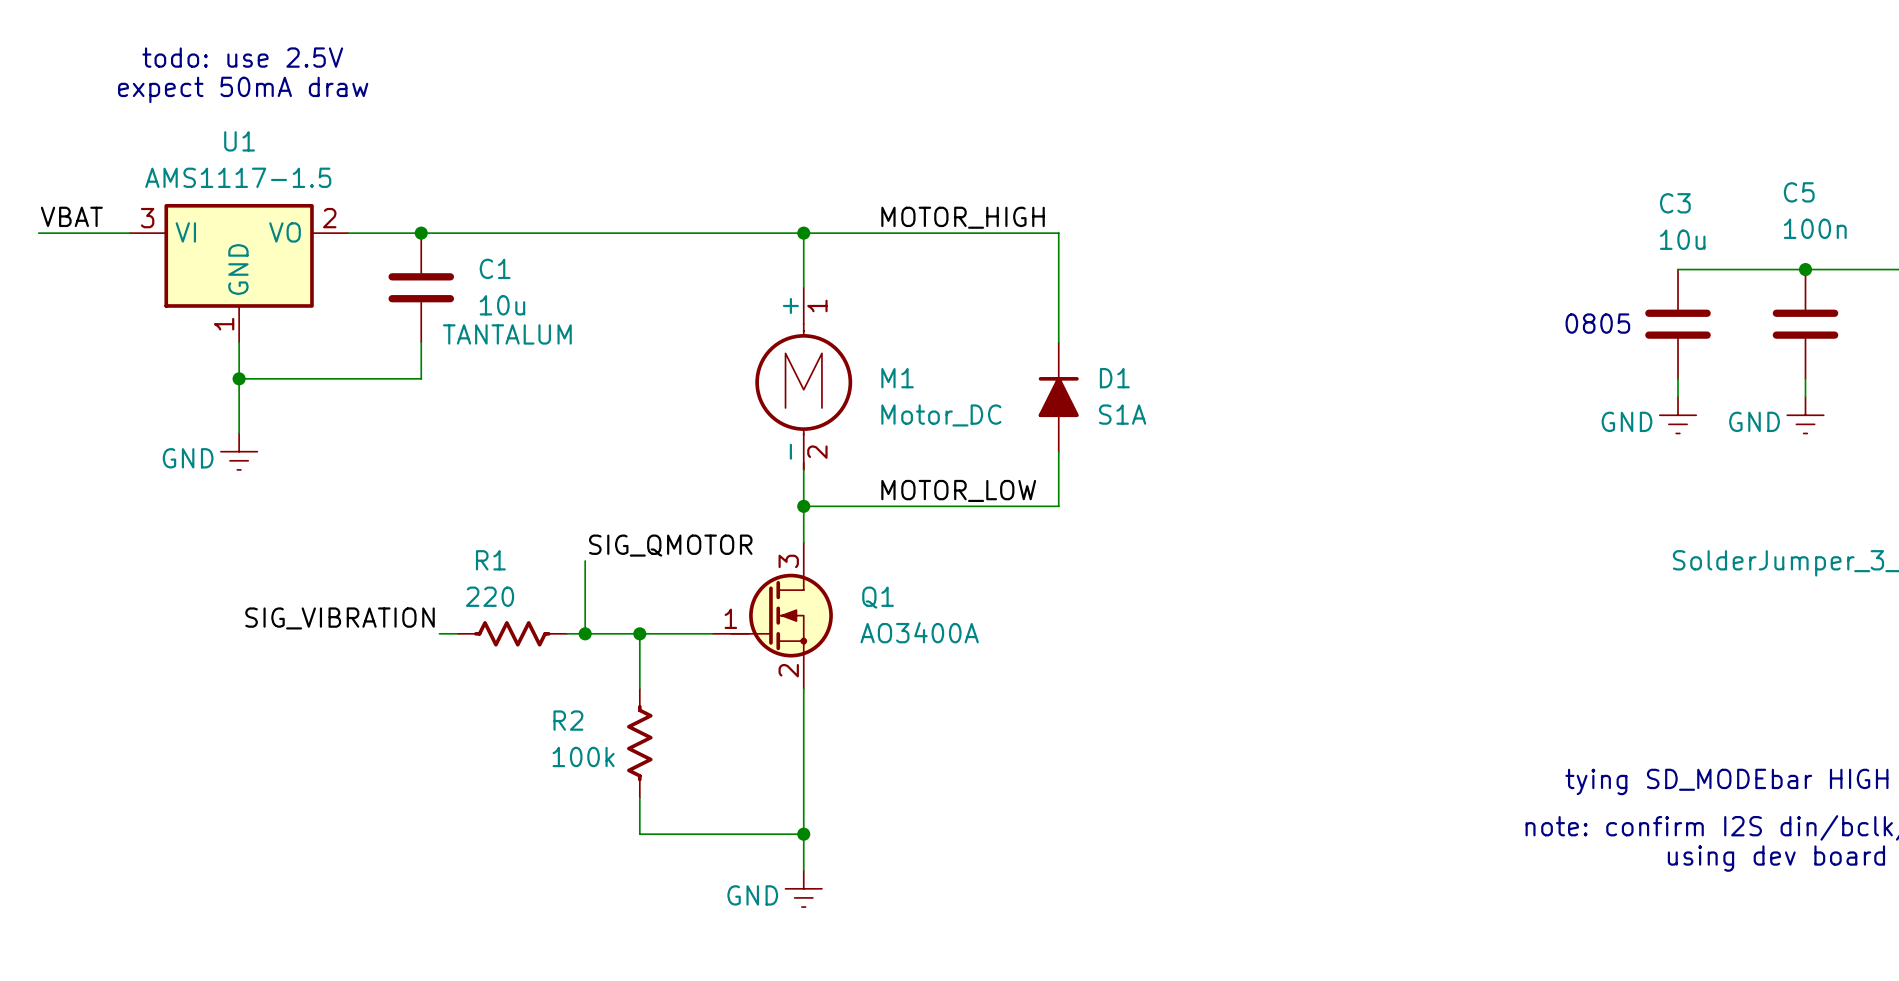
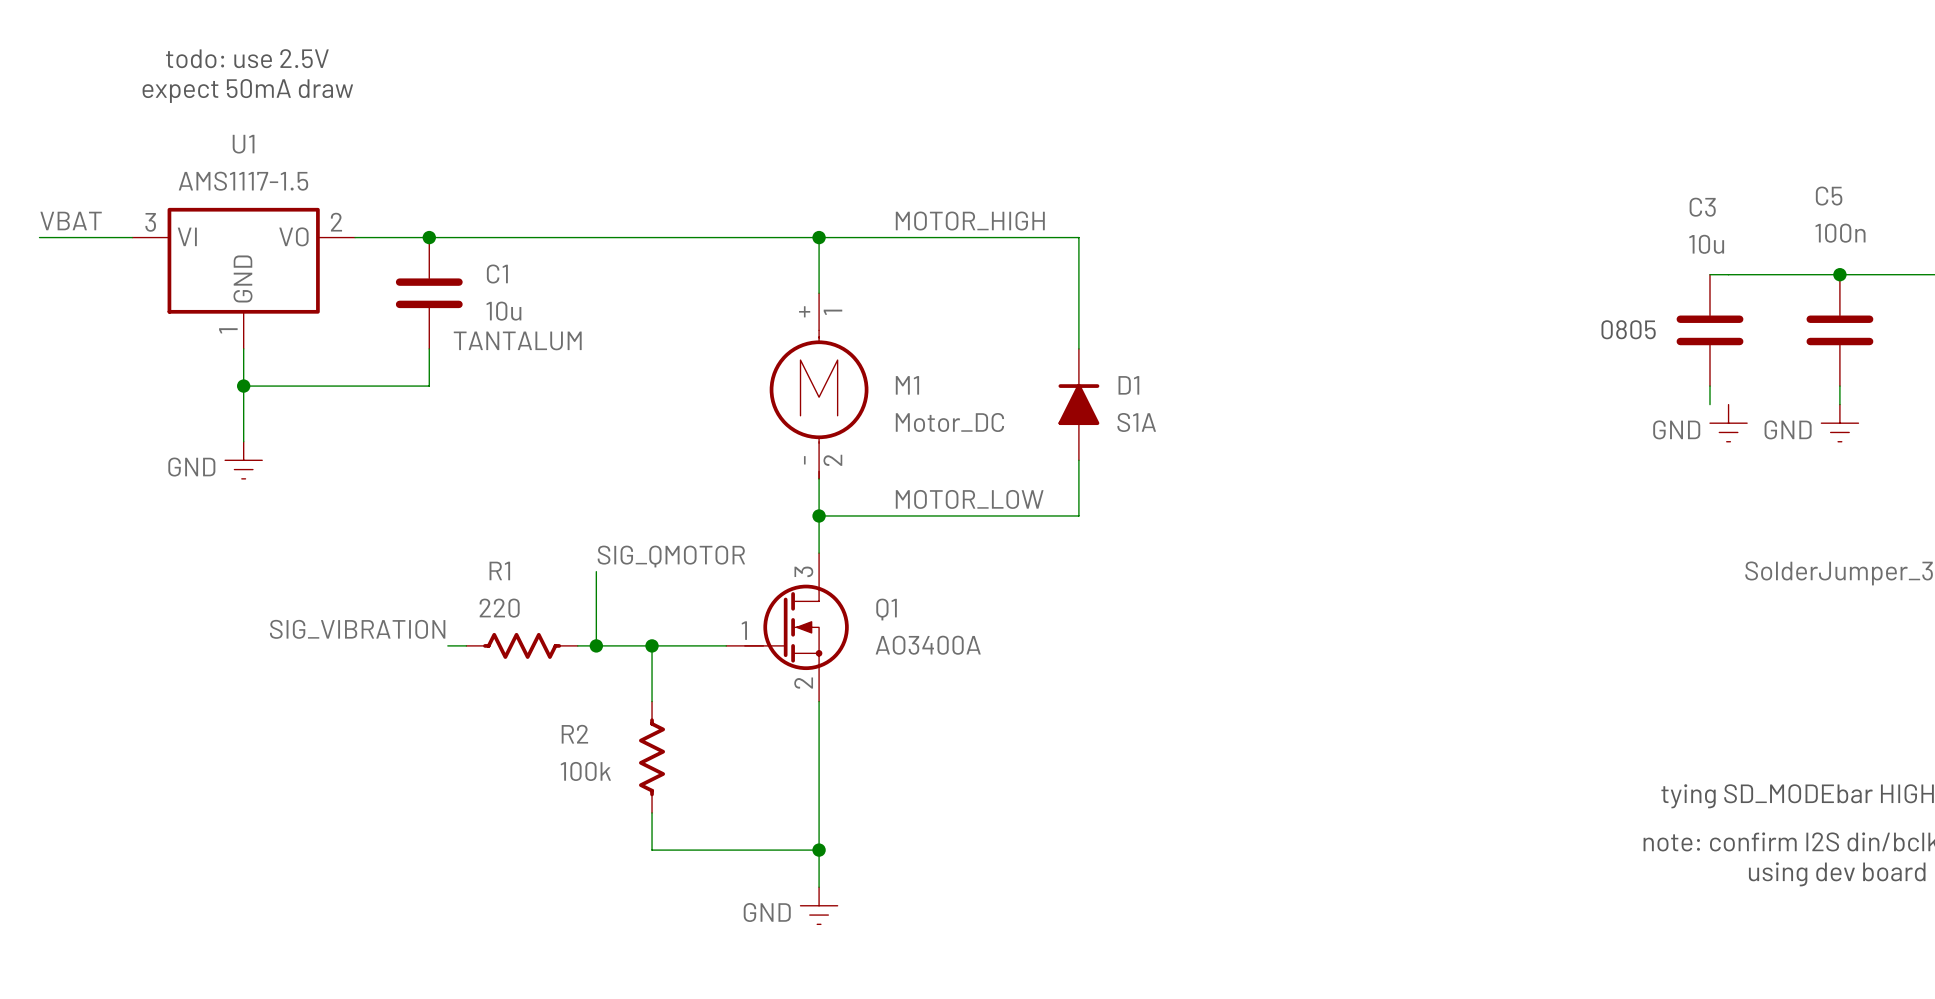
power symbol position: GND (1678, 415) -> GND (1728, 423)

